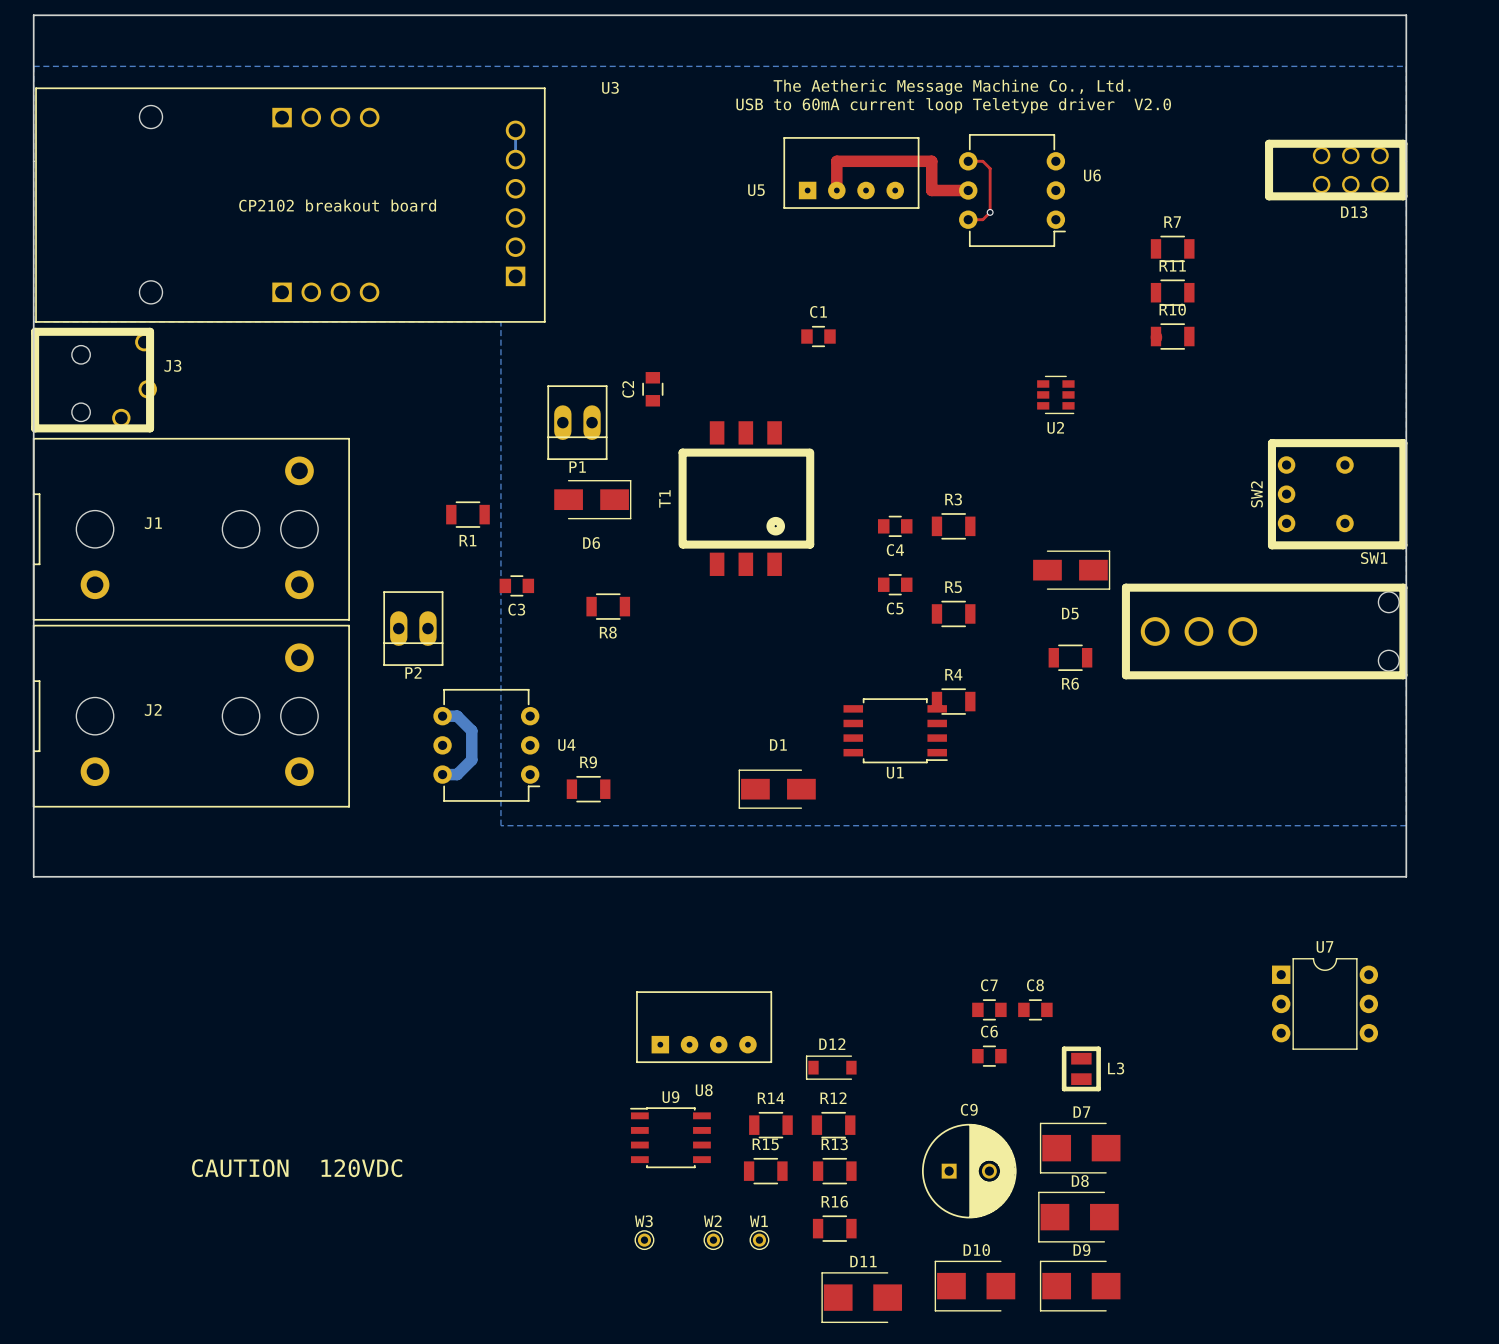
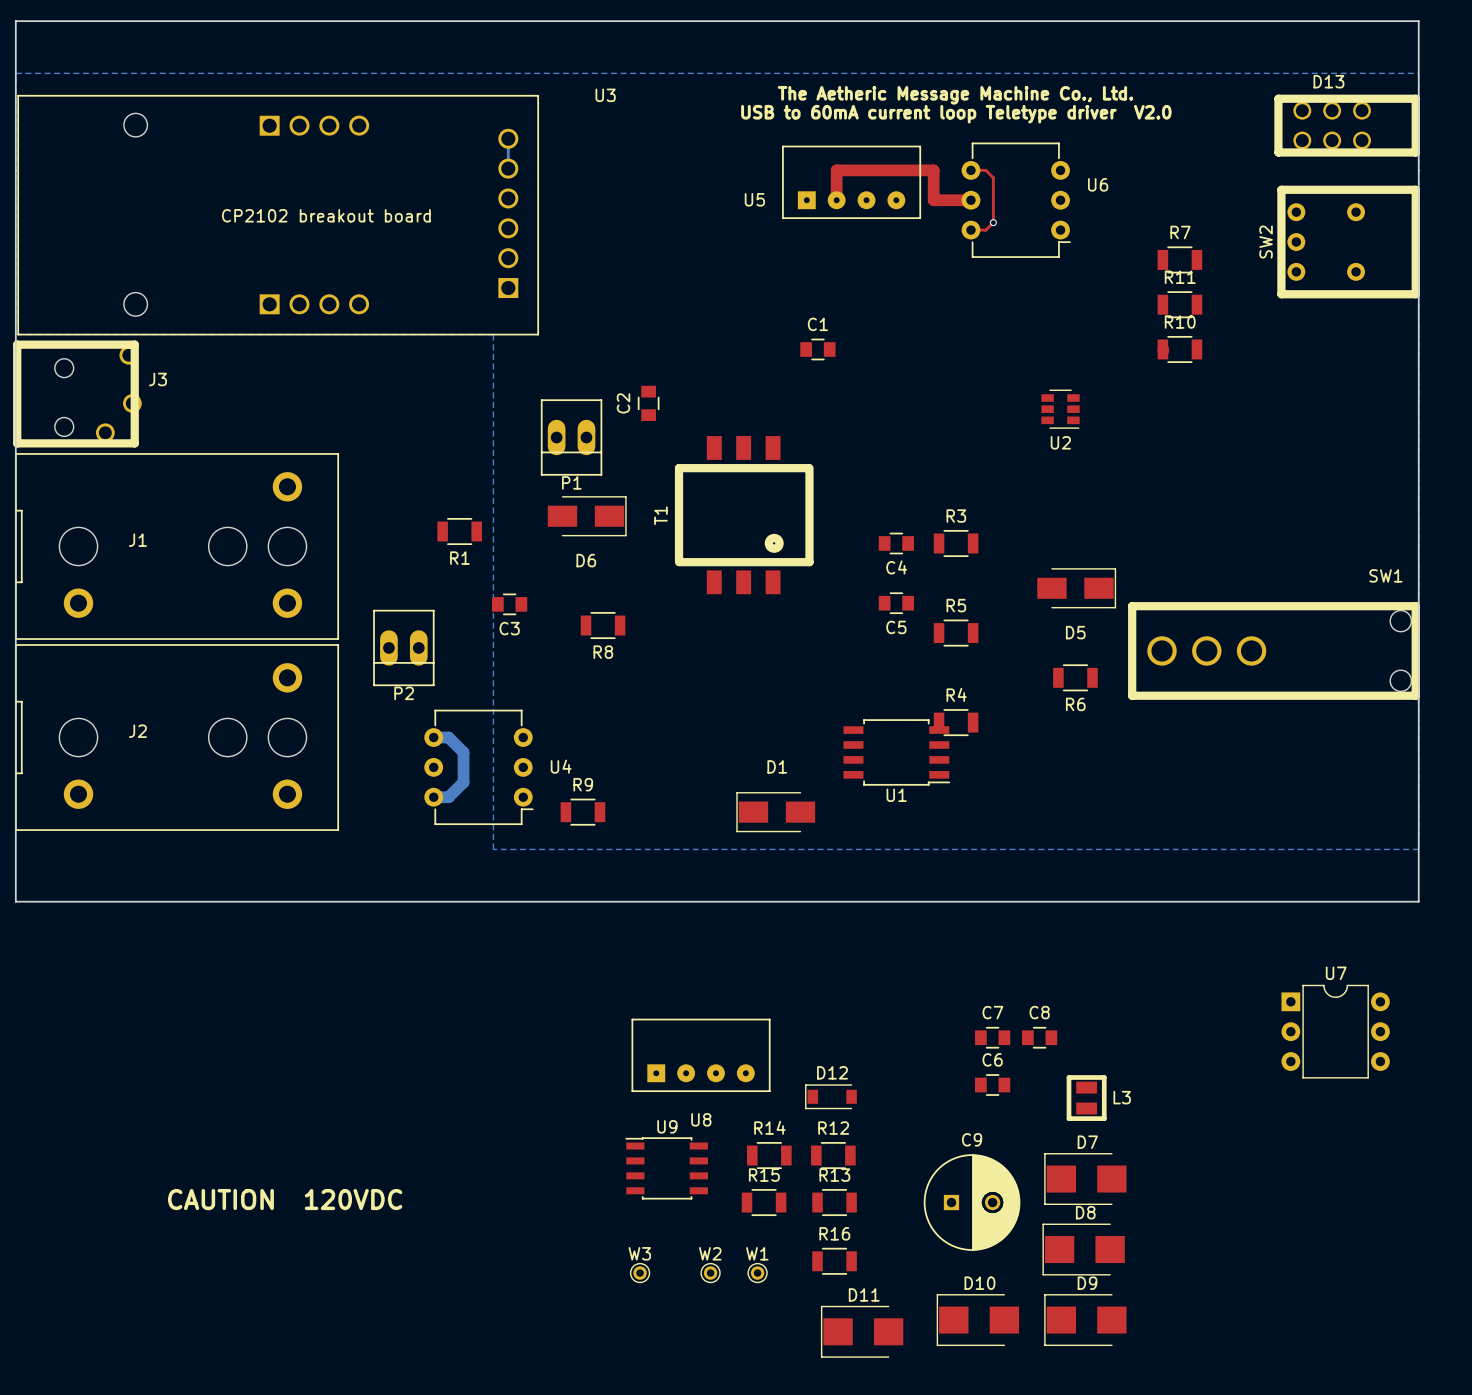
D13 rotation: 0° (1336, 170) -> 180° (1347, 125)
SW2 position: (1337, 494) -> (1348, 242)

